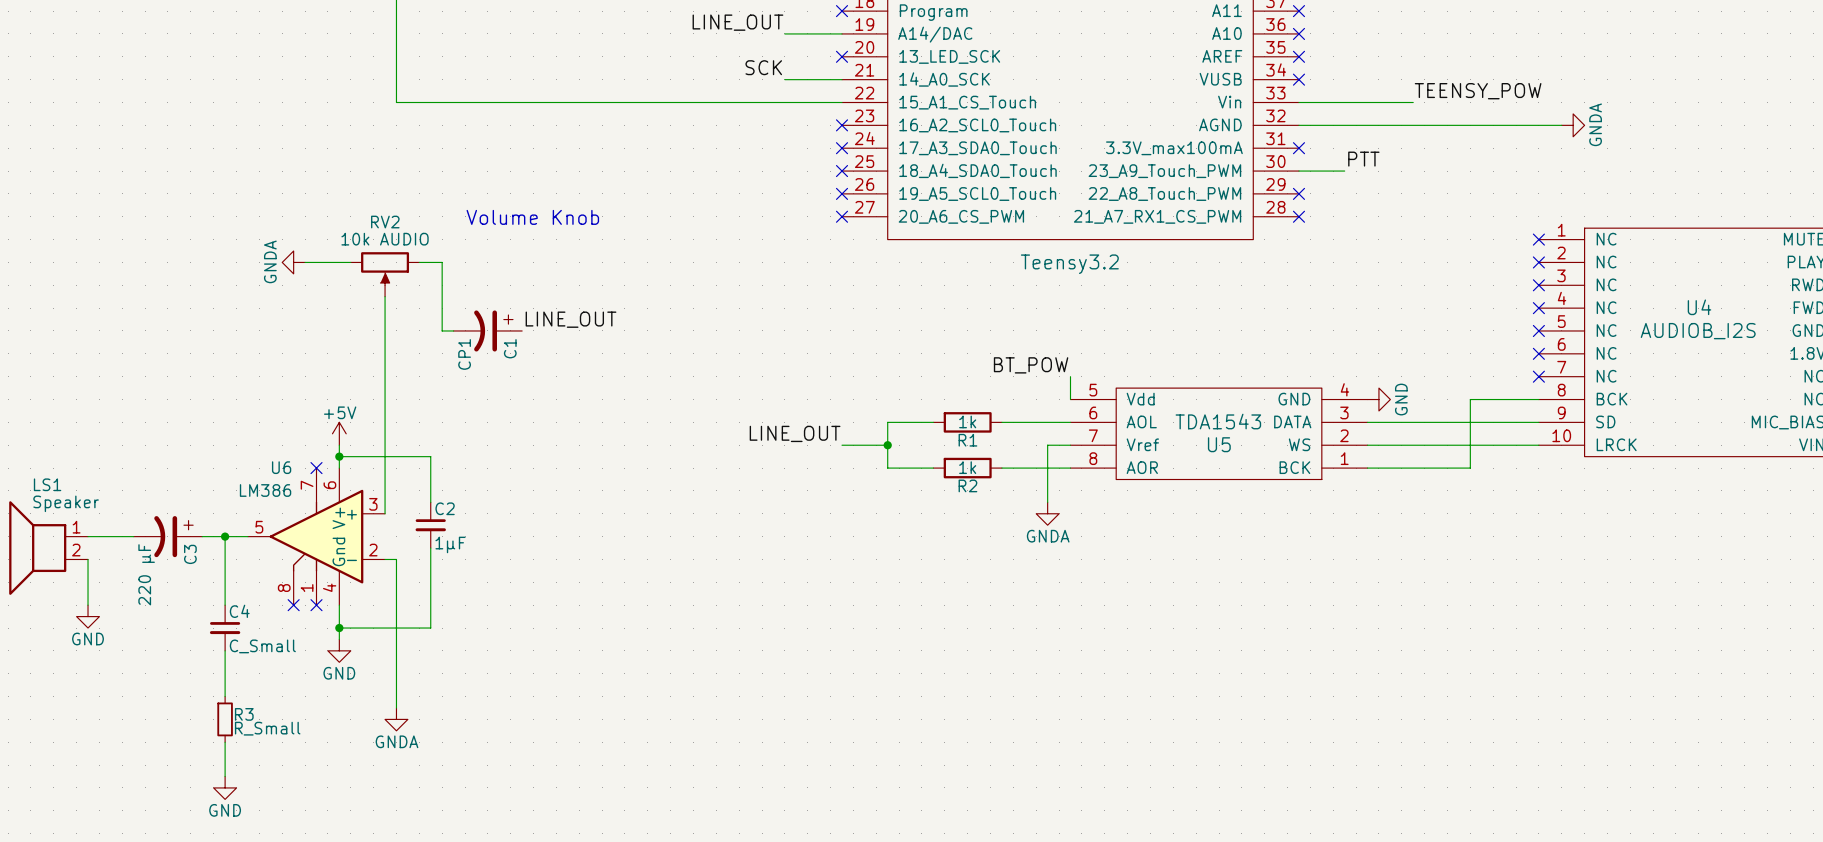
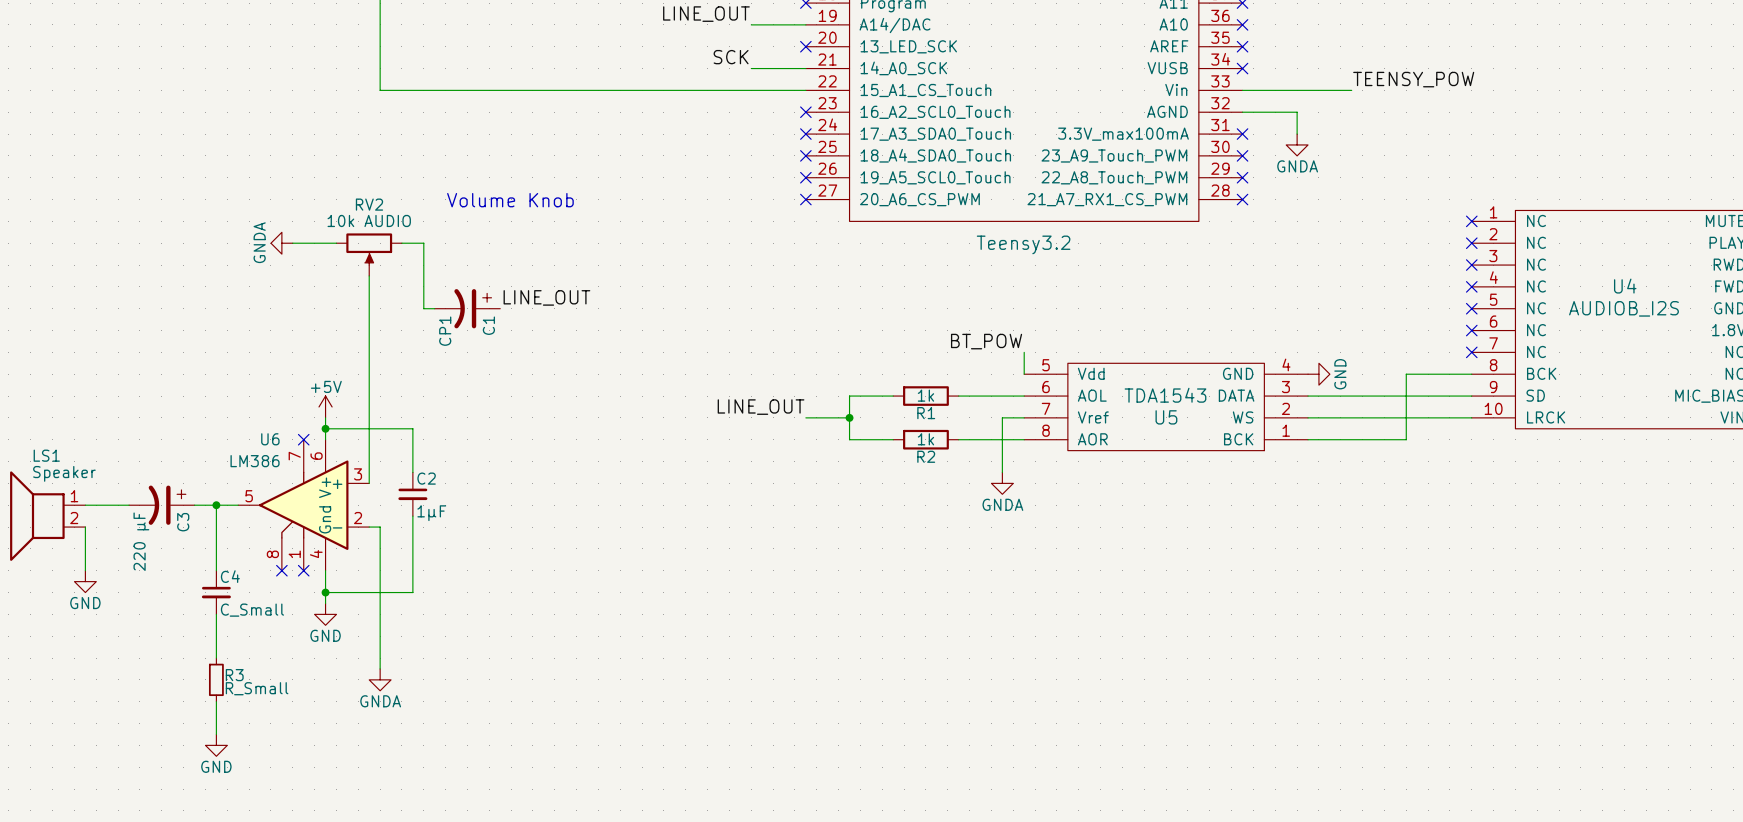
wire: (1356, 125) (1561, 125) -> (1297, 112) (1297, 134)
power symbol rotation: 0° (1573, 125) -> 90° clockwise (1297, 144)
power symbol position: GNDA (1573, 125) -> GNDA (1297, 144)
label: PTT (1363, 159) -> none
wire: (1298, 171) (1344, 171) -> none
no-connect mark: none -> (1242, 155)

